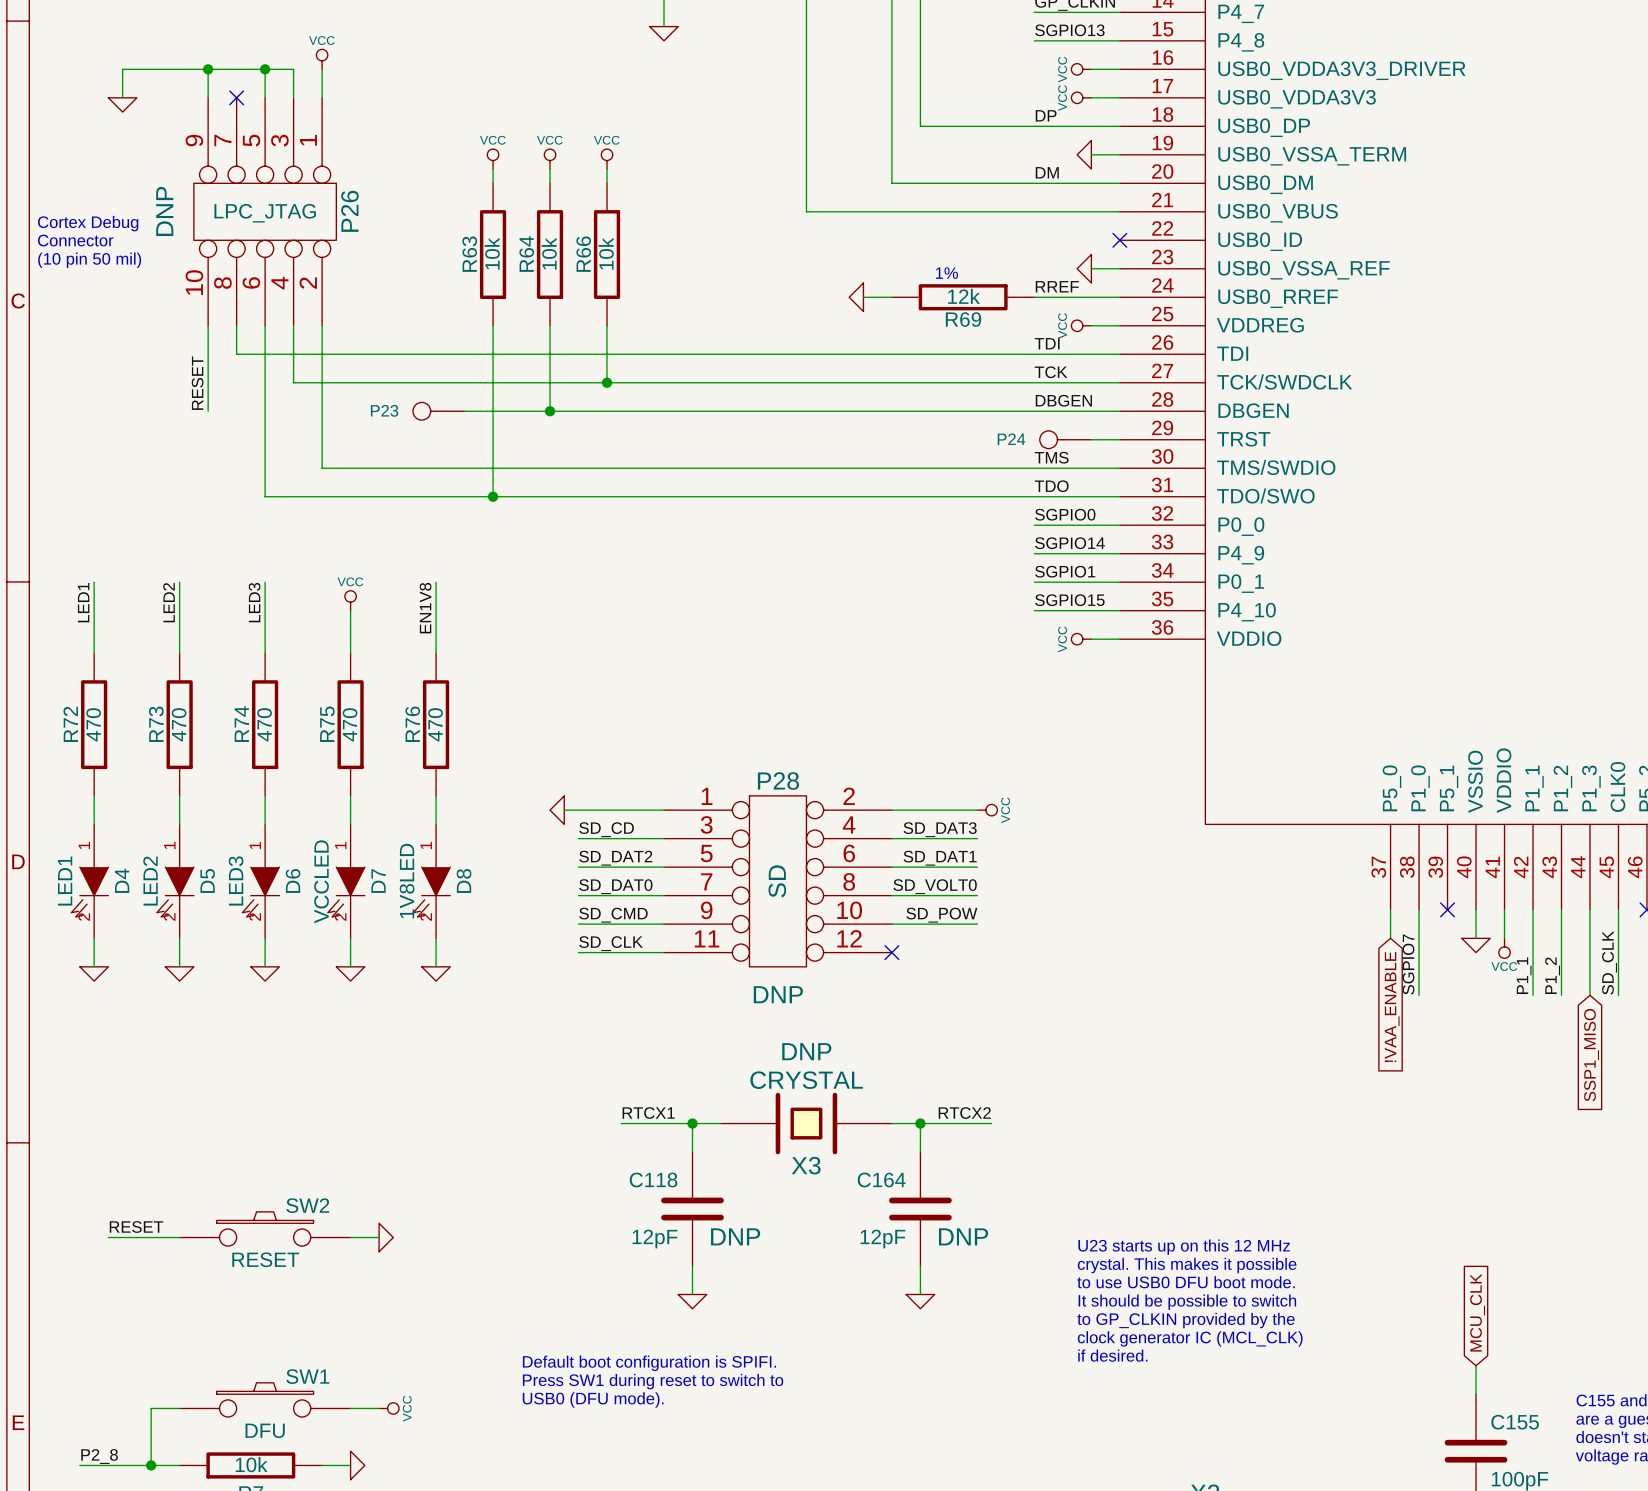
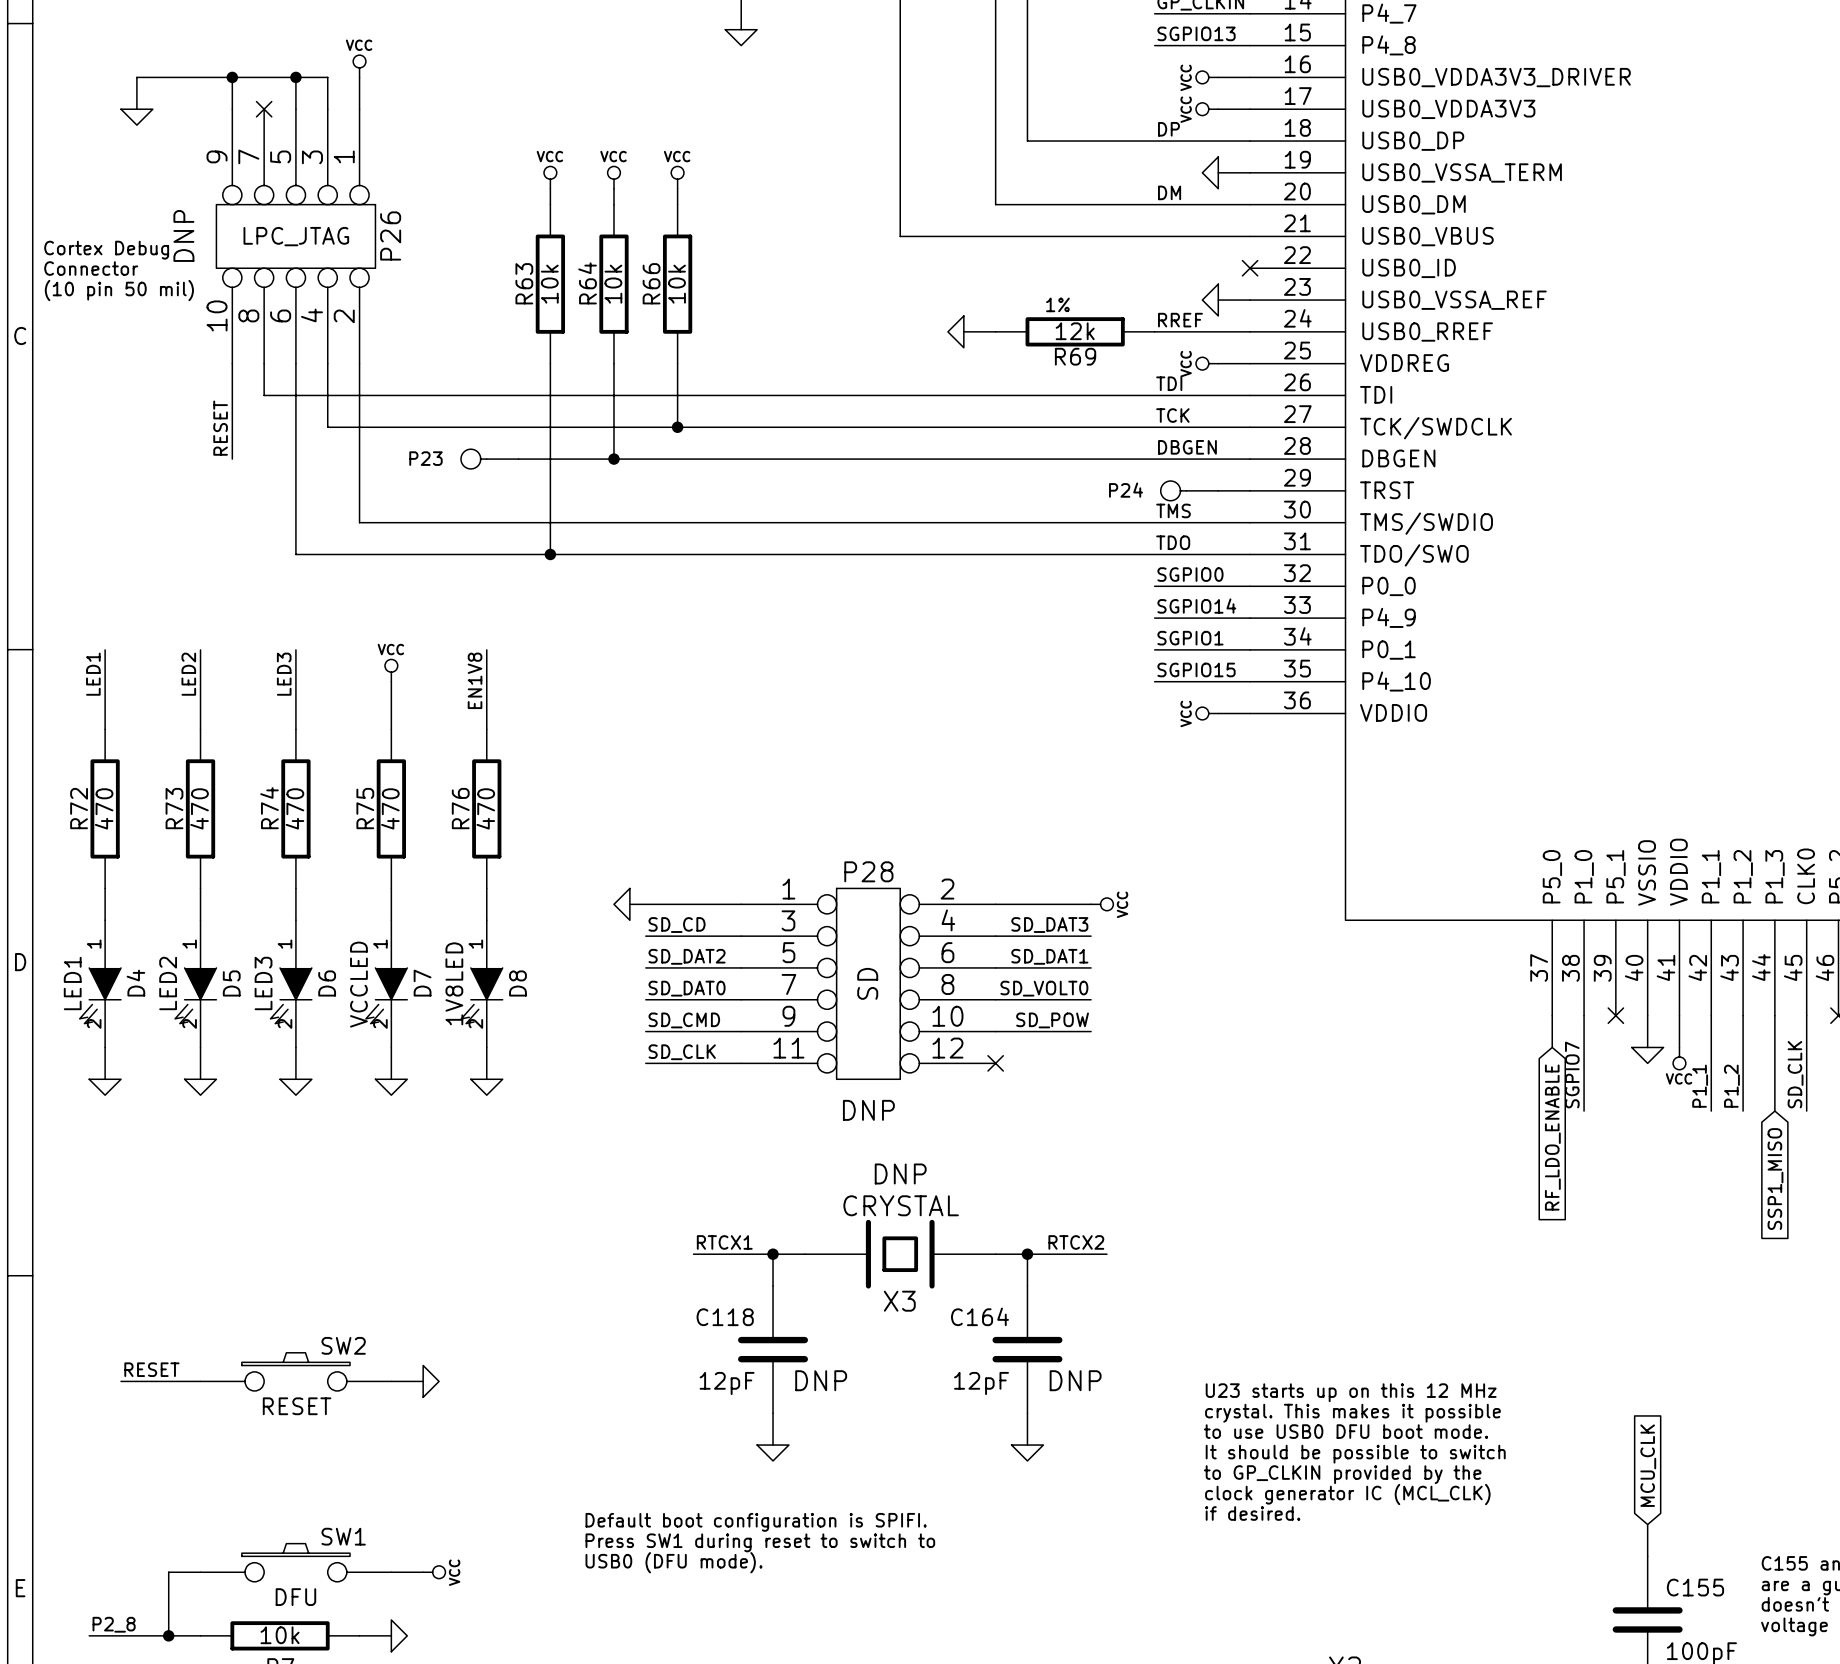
global label: !VAA_ENABLE (1392, 1006) -> RF_LDO_ENABLE (1552, 1137)

